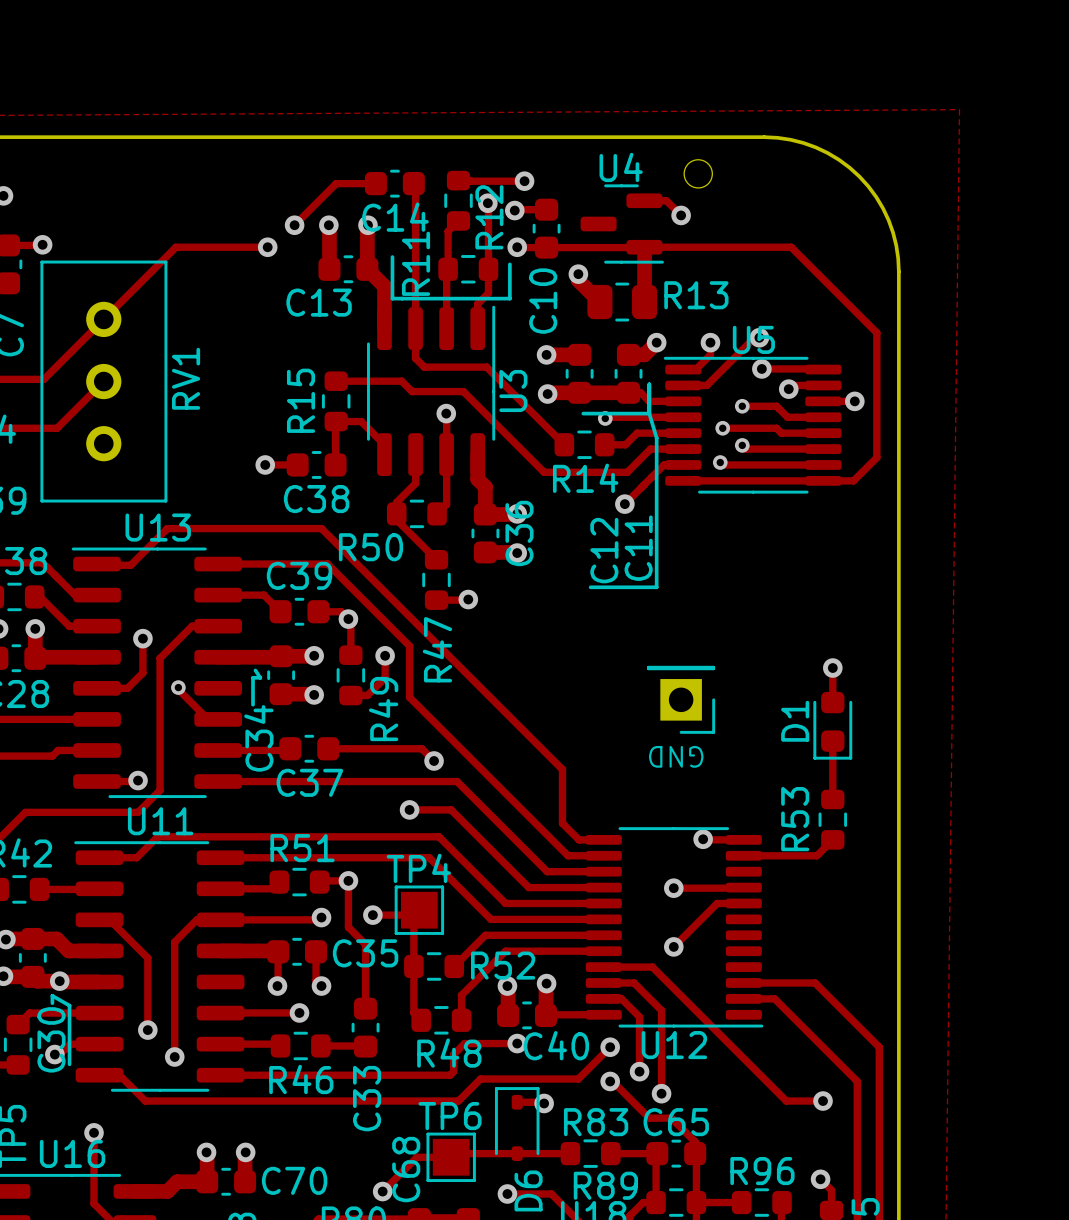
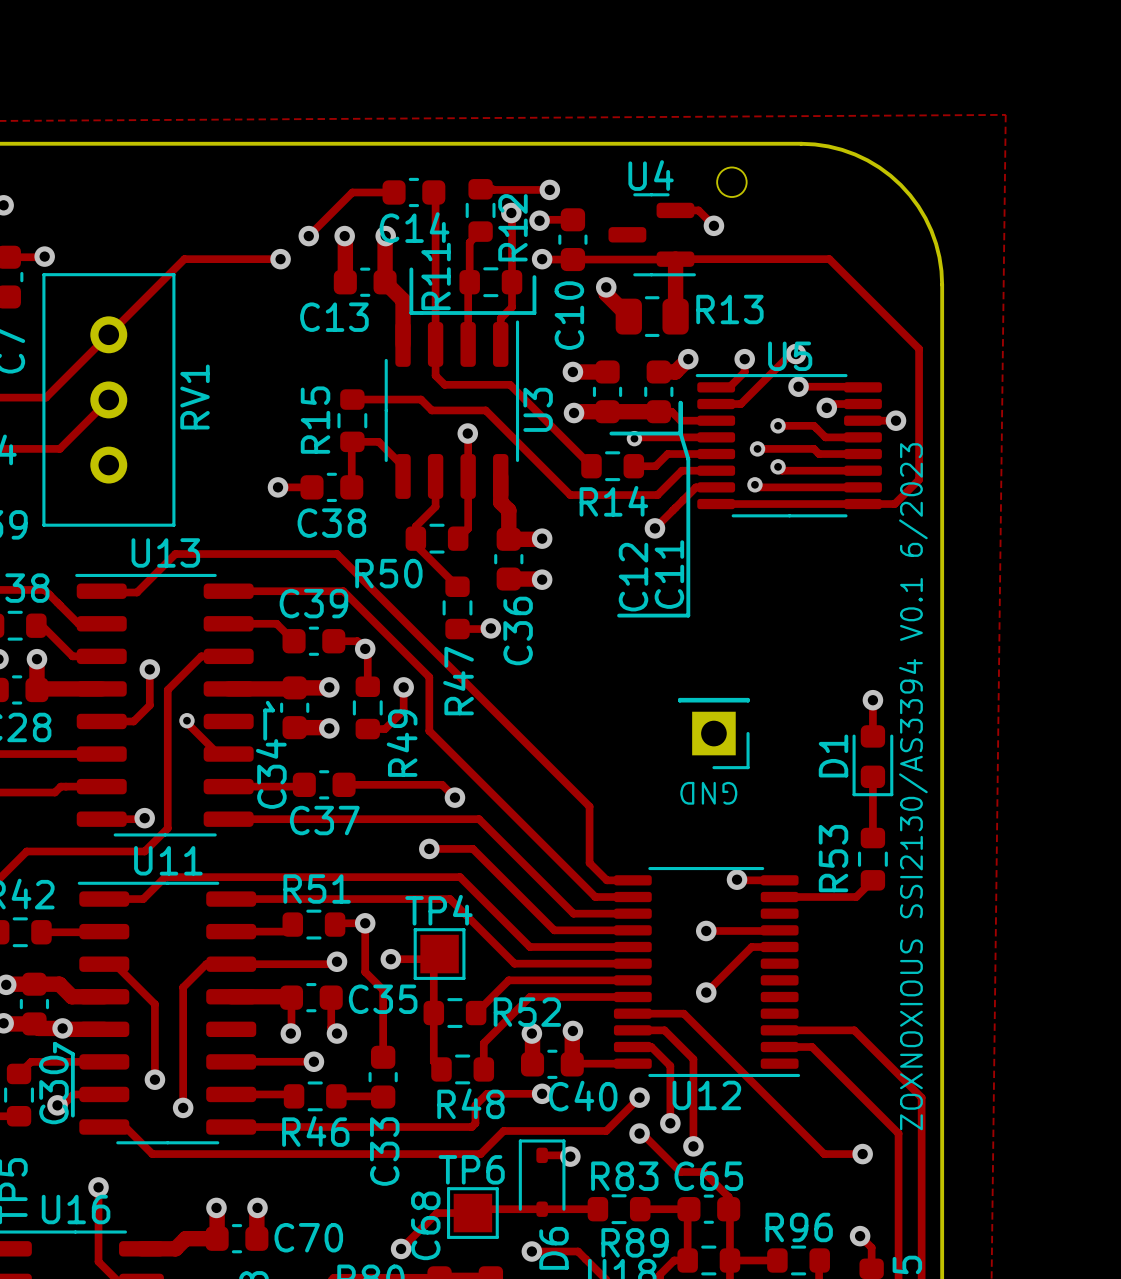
C36 name position: C36 (519, 533) -> C36 (518, 630)
text: none -> ZOXNOXIOUS SSI2130/AS3394 V0.1 6/2023 (913, 786)

